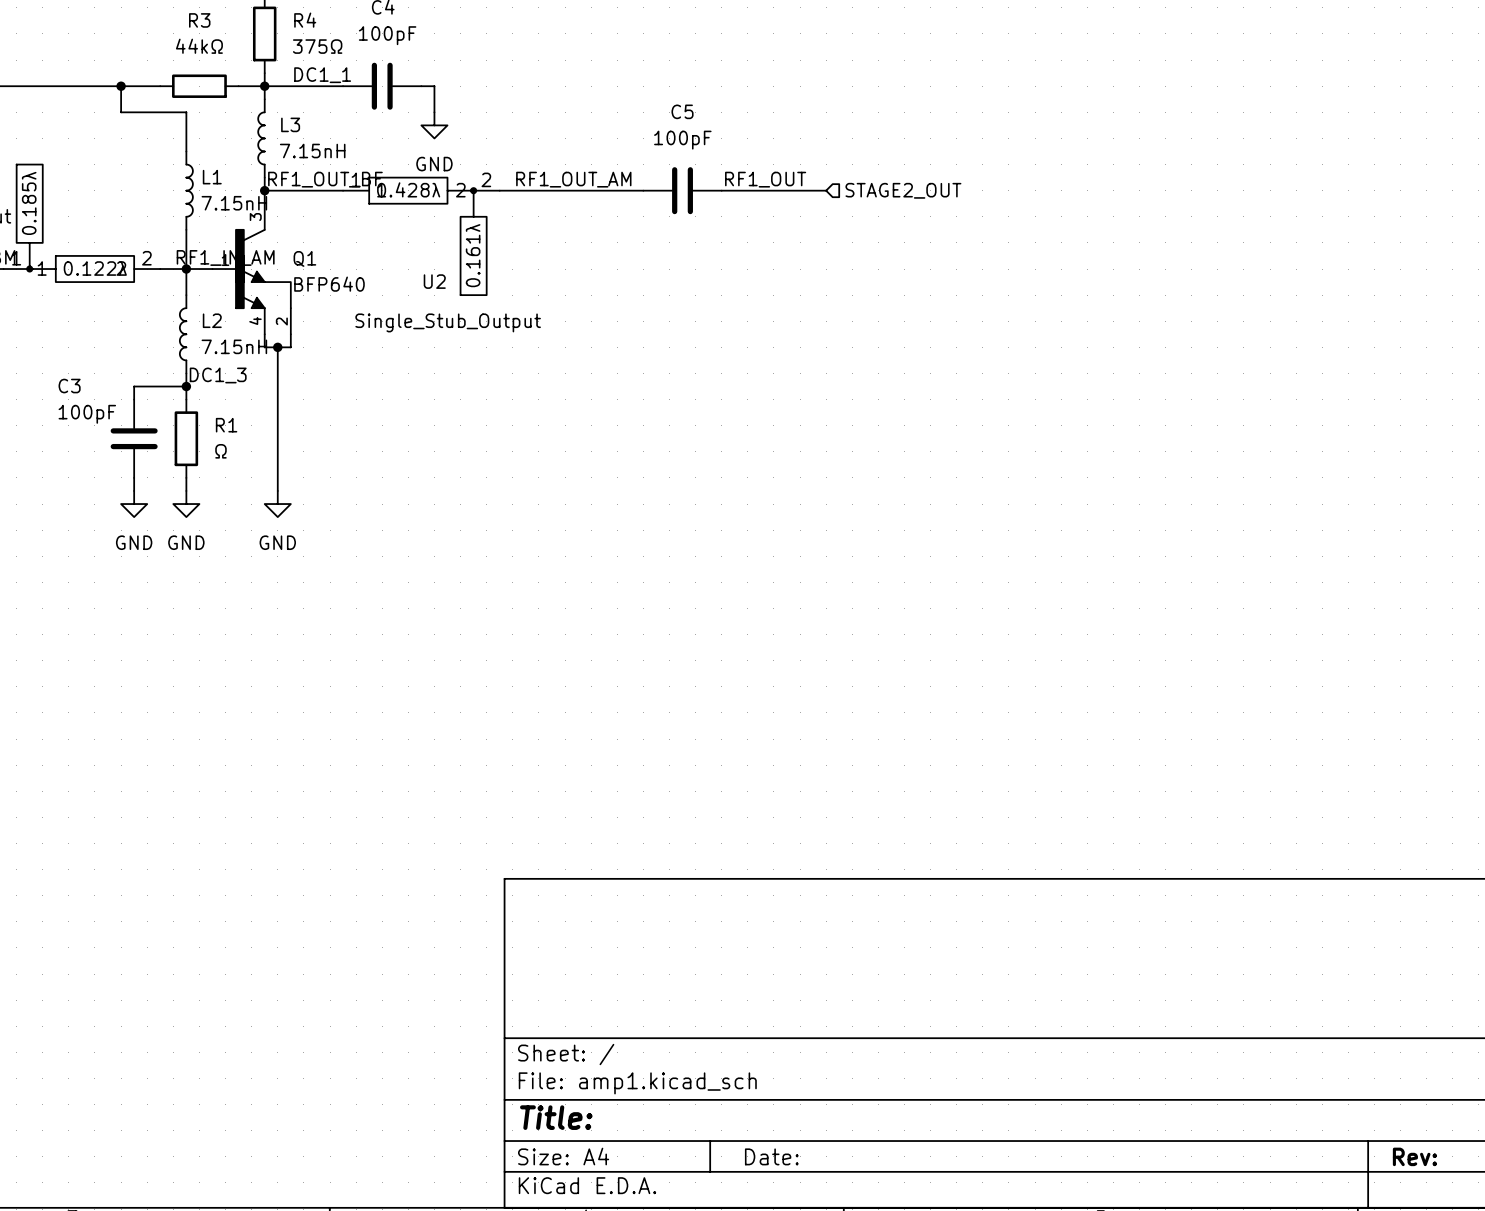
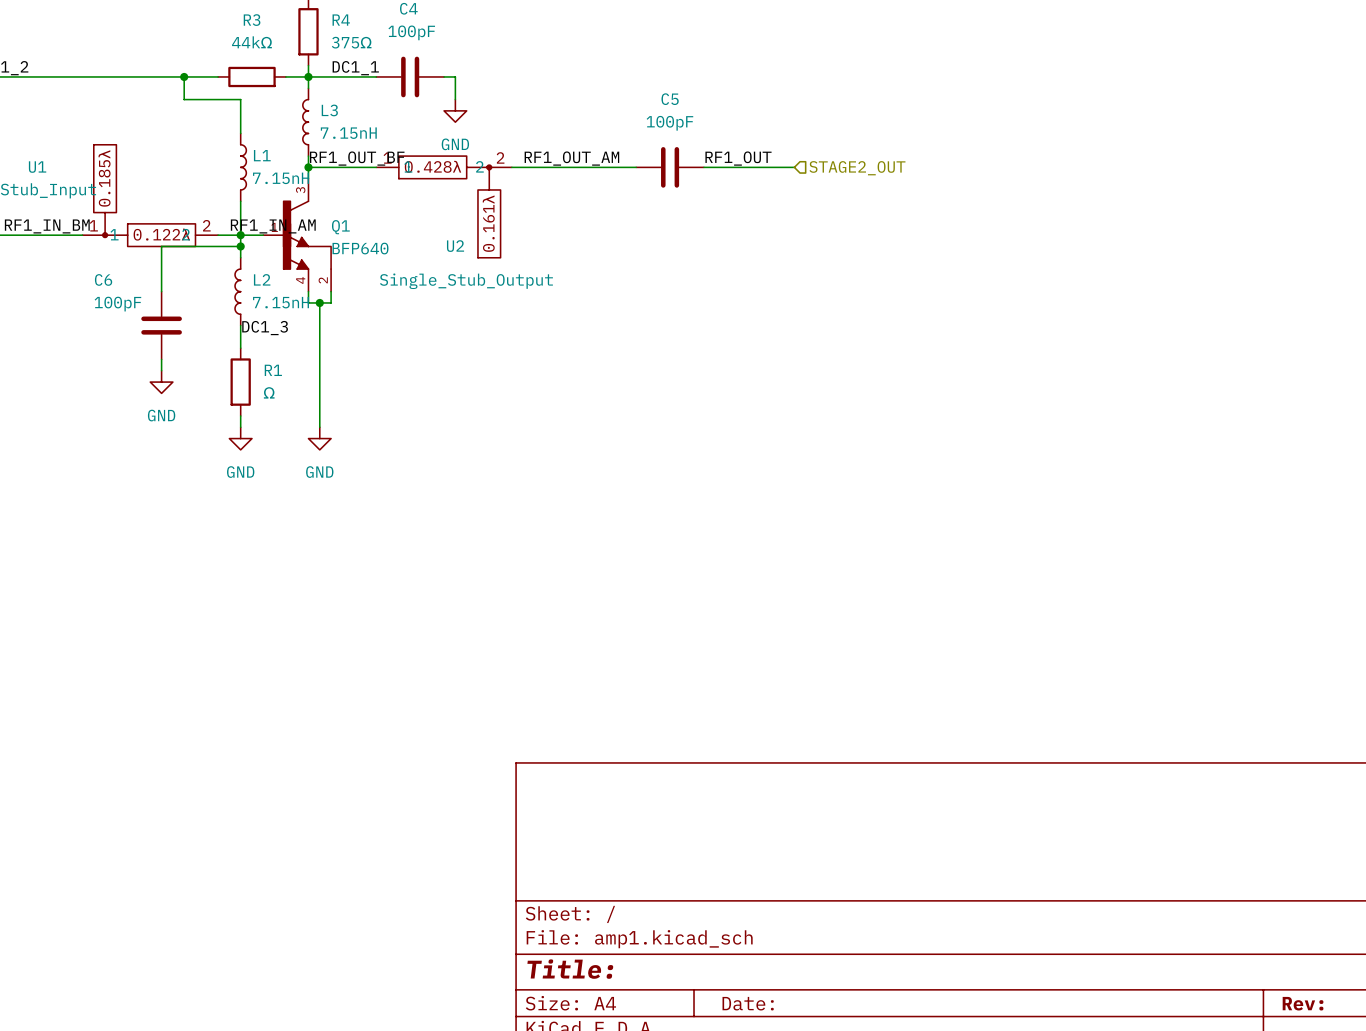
wire: none -> (240, 246) (161, 246) (161, 291)
junction: none -> (240, 246)
C6: none -> 100pF (161, 325)
wire: (186, 386) (134, 386) (134, 399) -> none
junction: (186, 386) -> none
C3: 100pF (134, 438) -> none
wire: (134, 477) (134, 490) -> (161, 359) (161, 370)
power symbol position: GND (134, 504) -> GND (161, 382)

